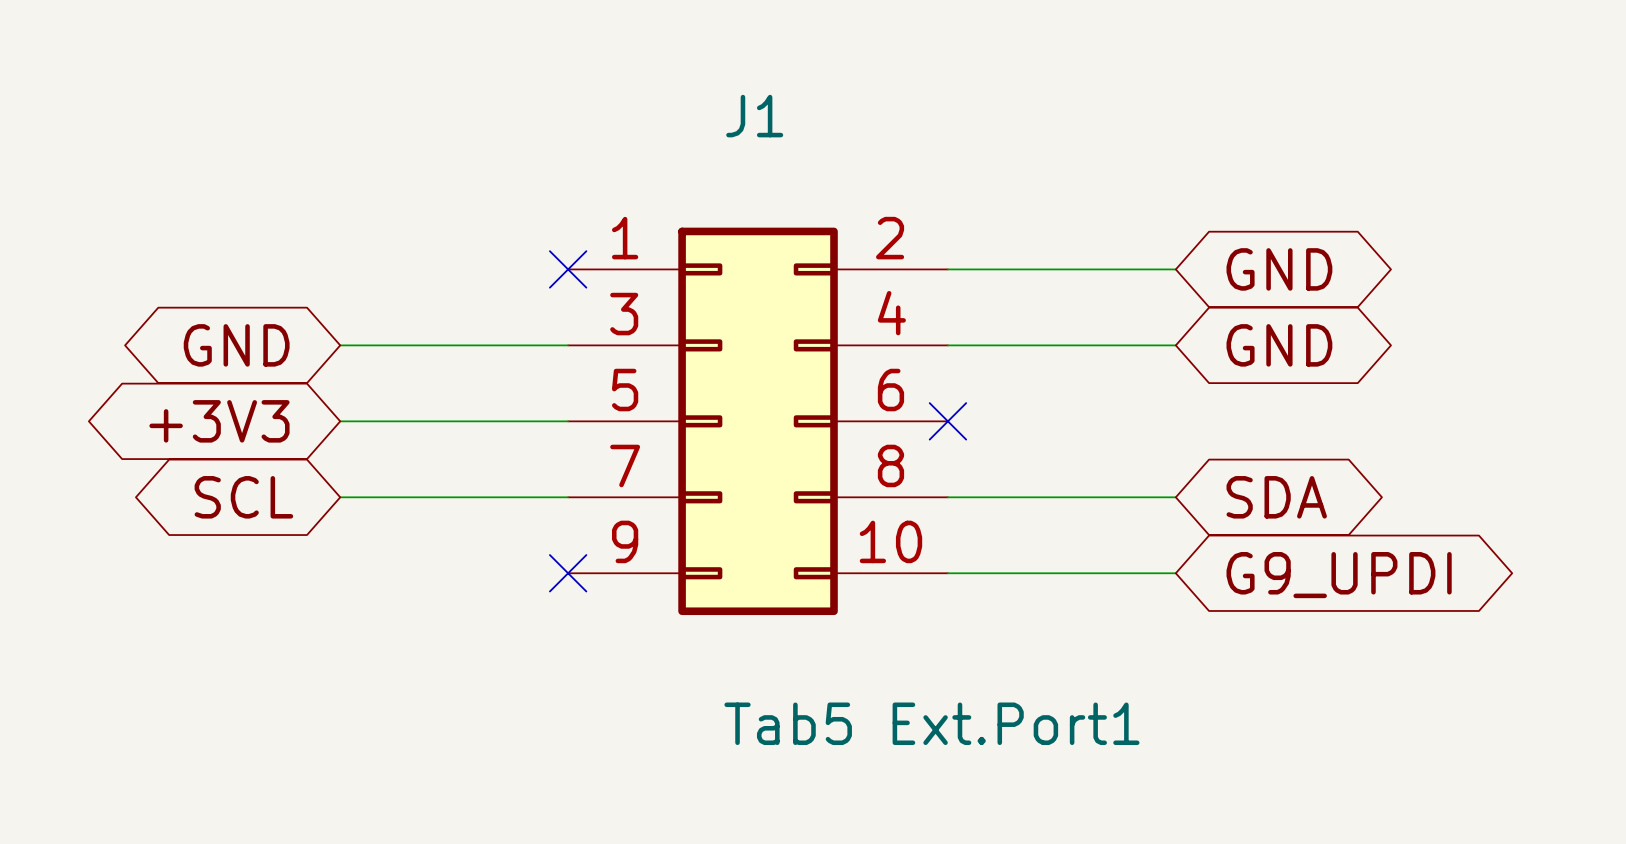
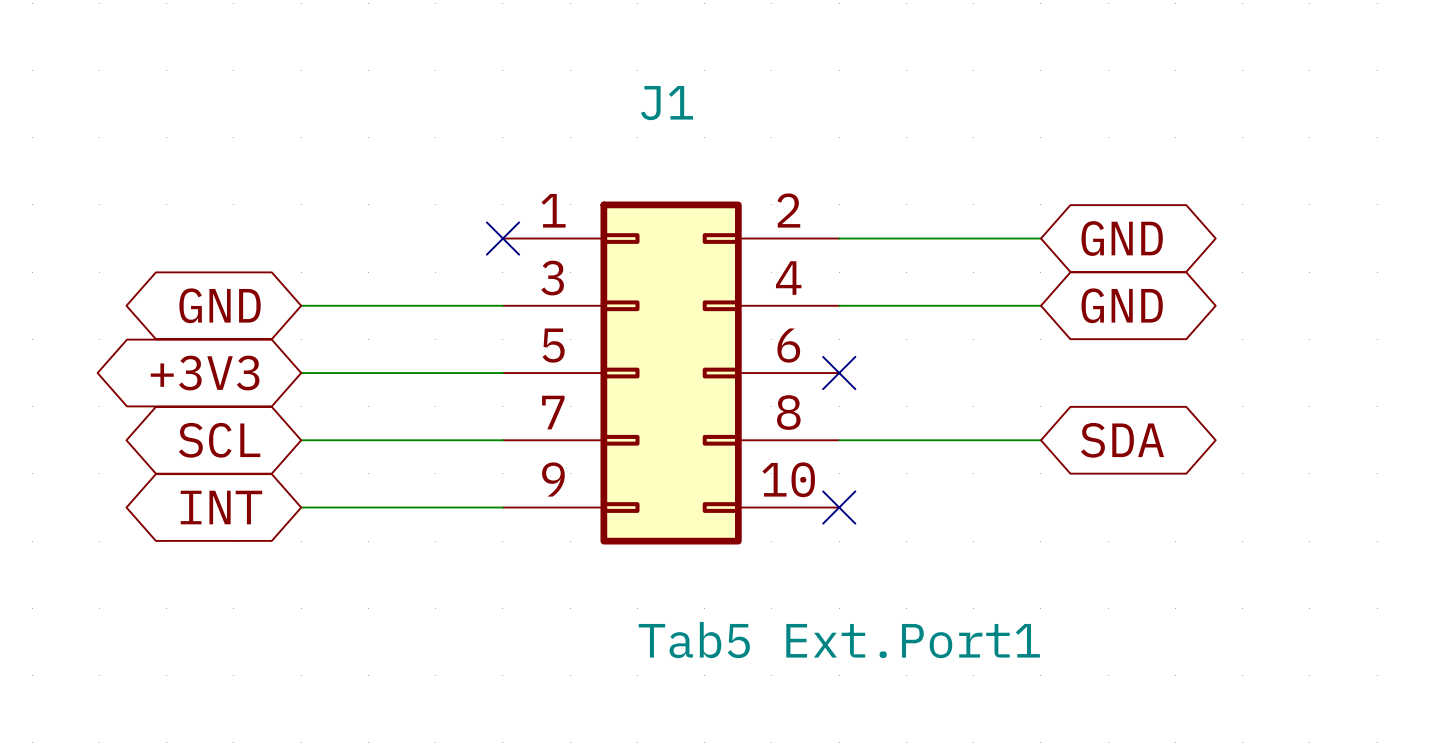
global label: none -> INT (221, 507)
no-connect mark: (568, 573) -> none
wire: (947, 573) (1175, 573) -> (301, 507) (502, 507)
no-connect mark: none -> (839, 507)
global label: G9_UPDI (1339, 575) -> none

